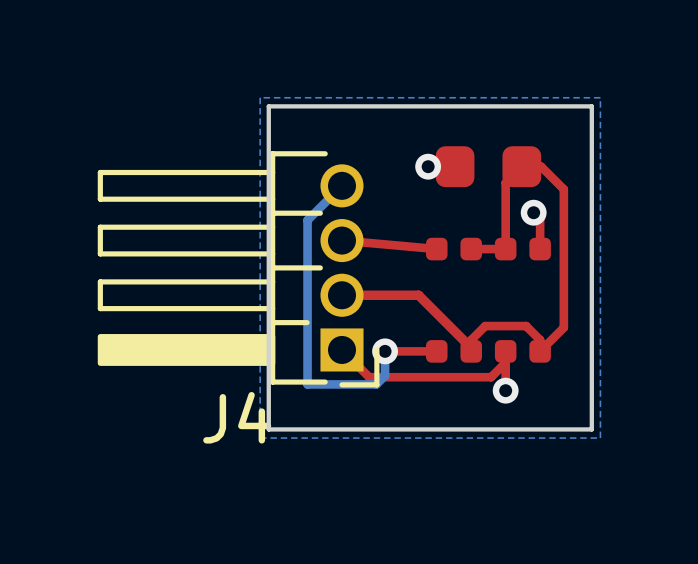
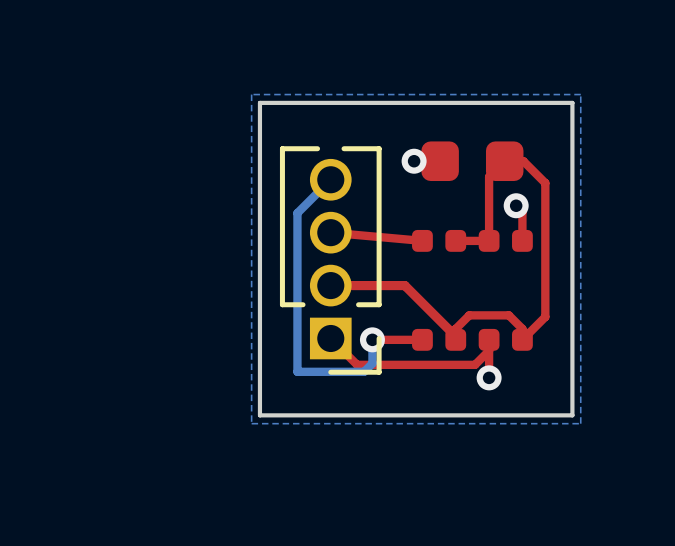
J4: (238, 269) -> none
part: none -> (330, 260)

